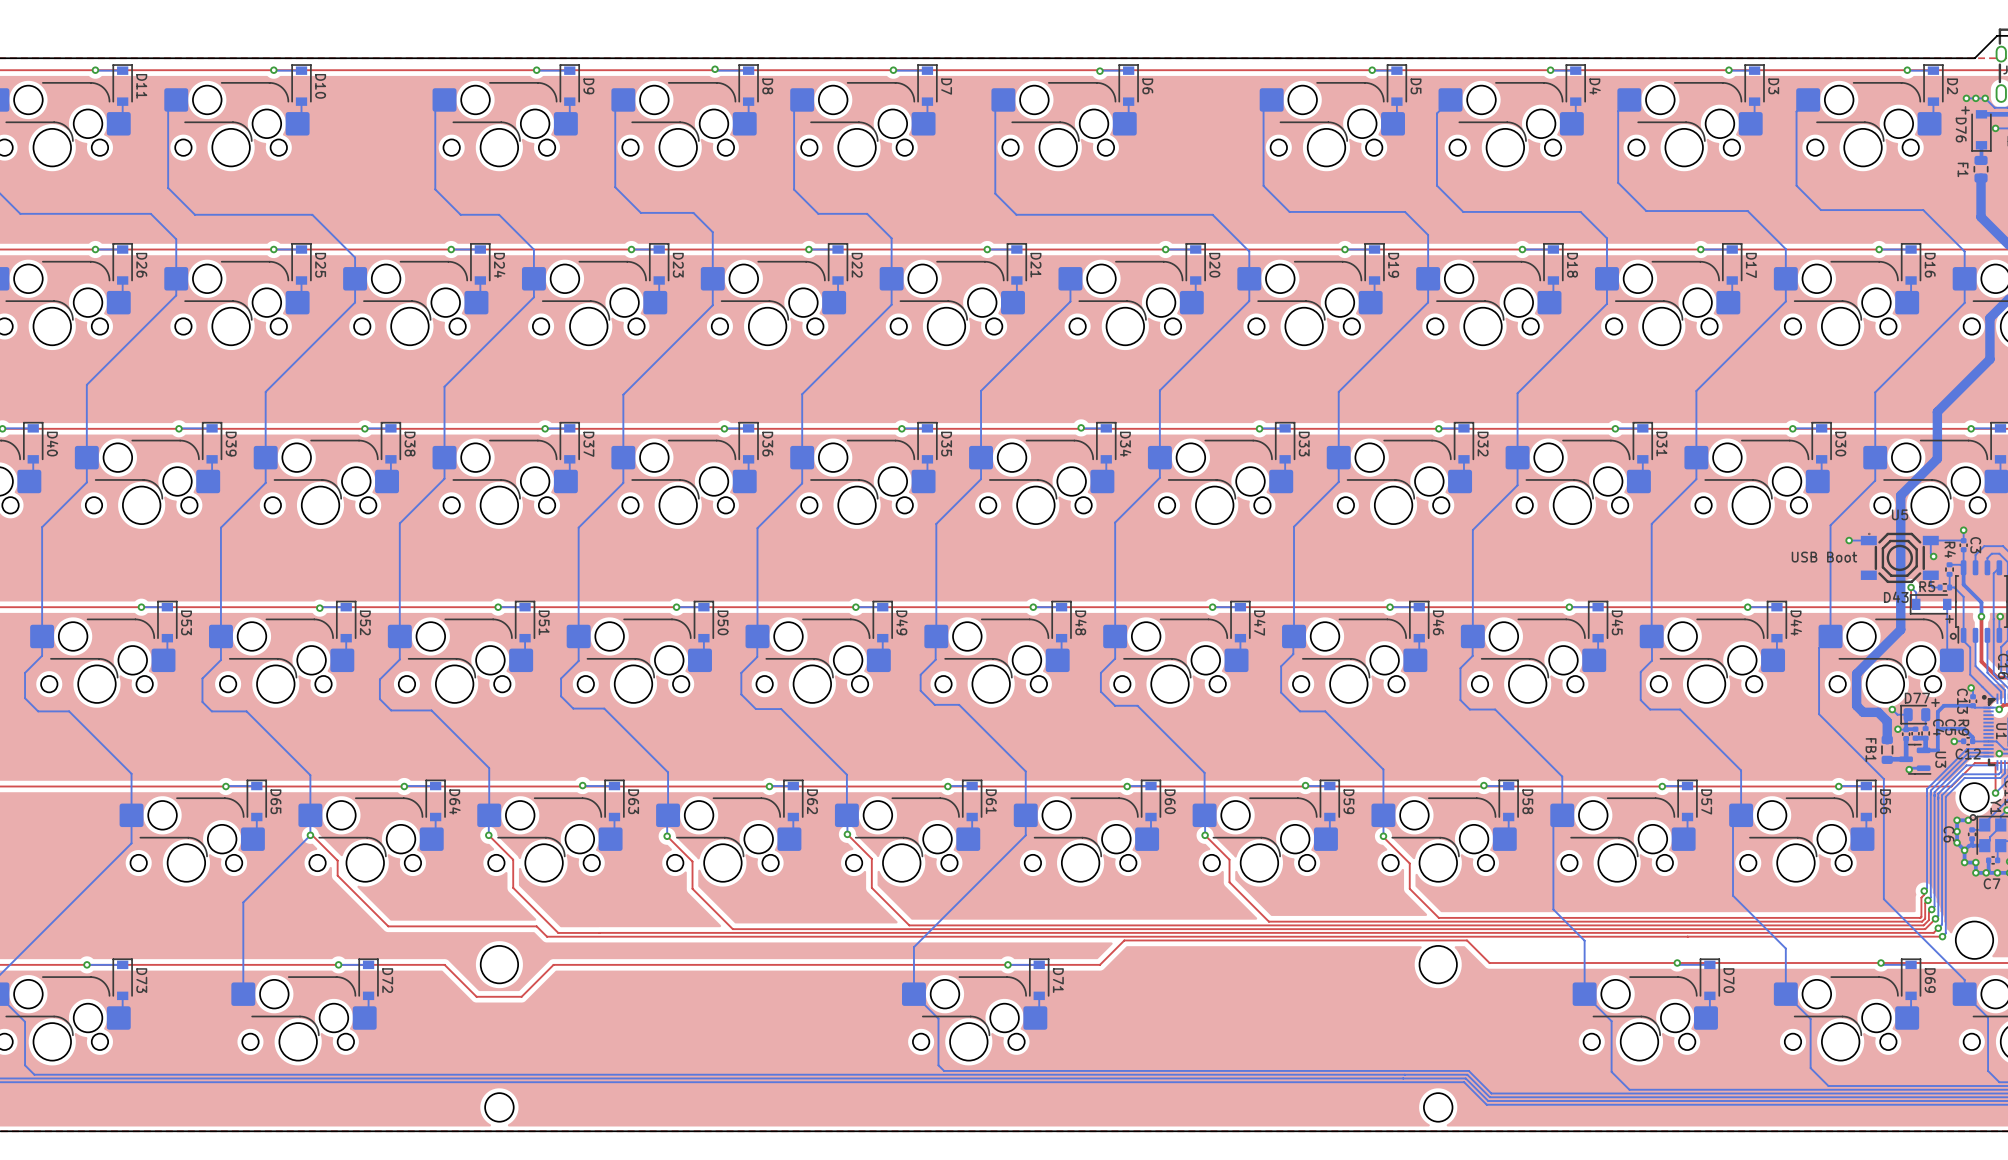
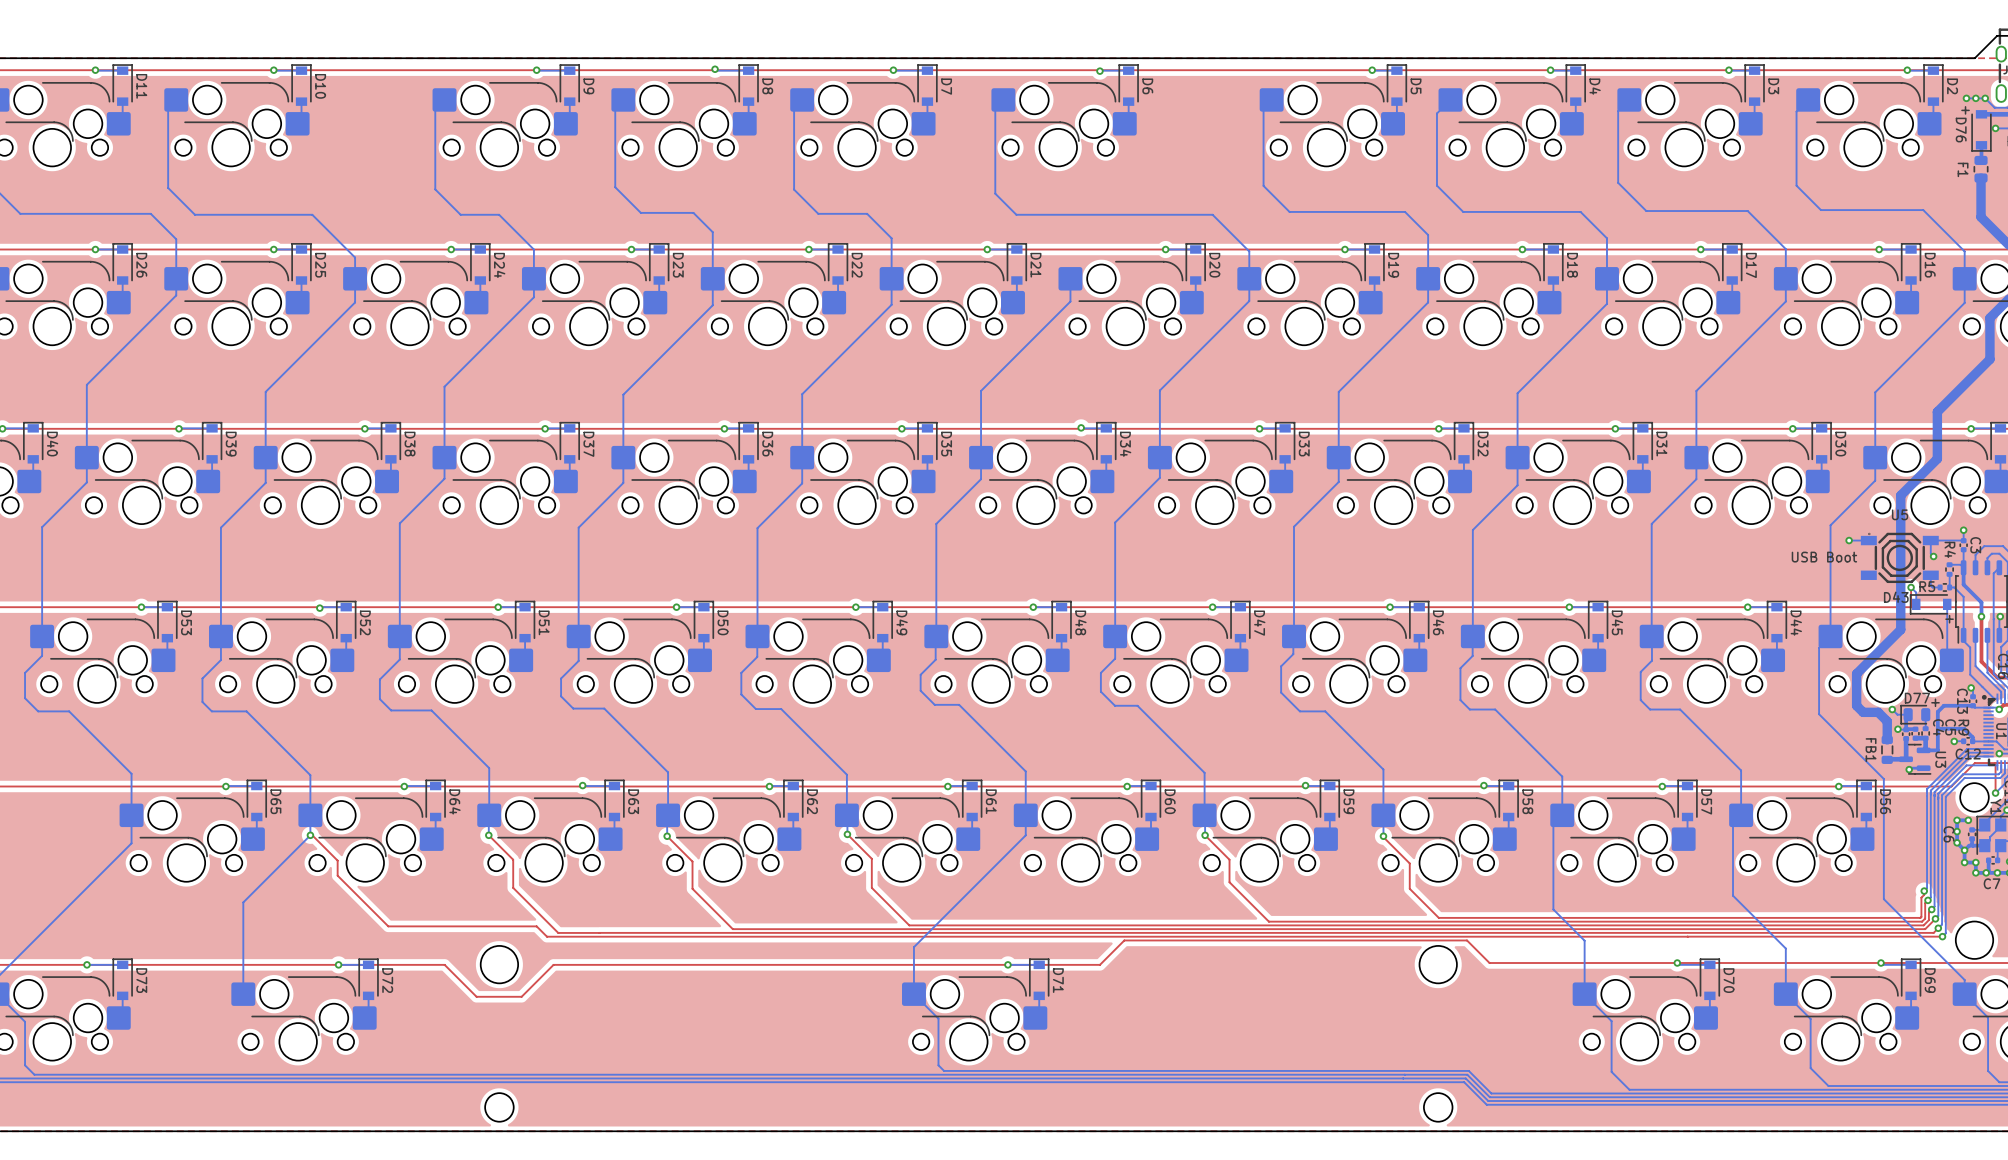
drawing: [1949, 632, 1957, 640] -> none
drawing: [1969, 814, 1977, 821] -> none

